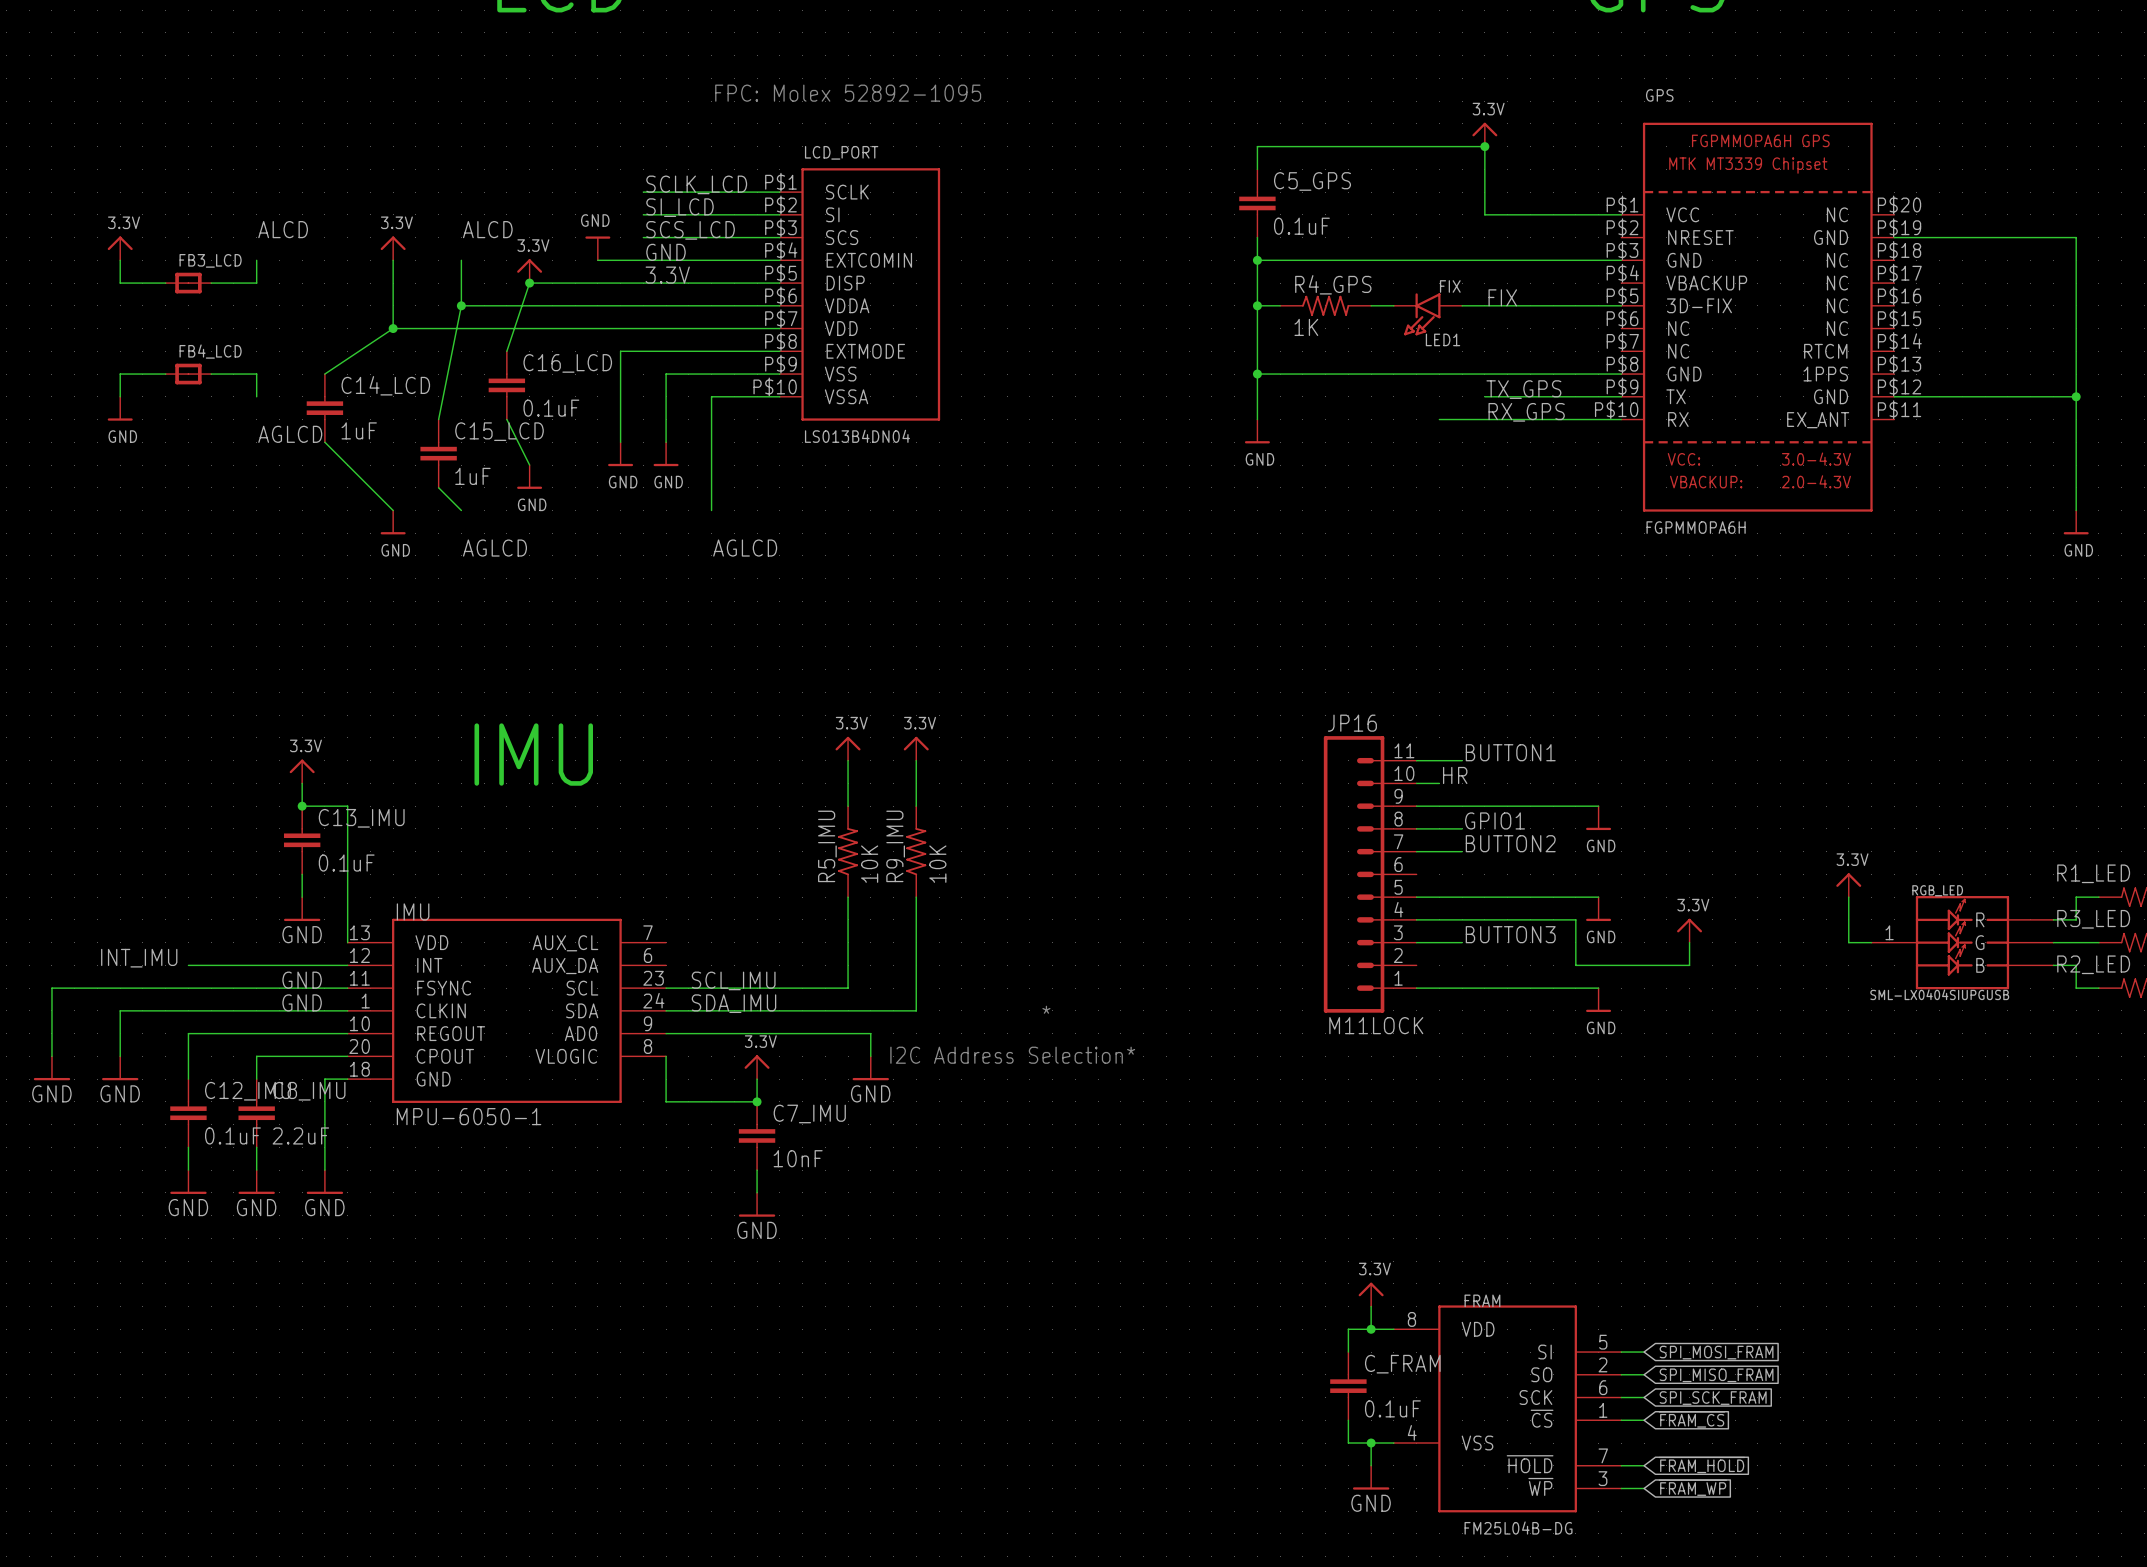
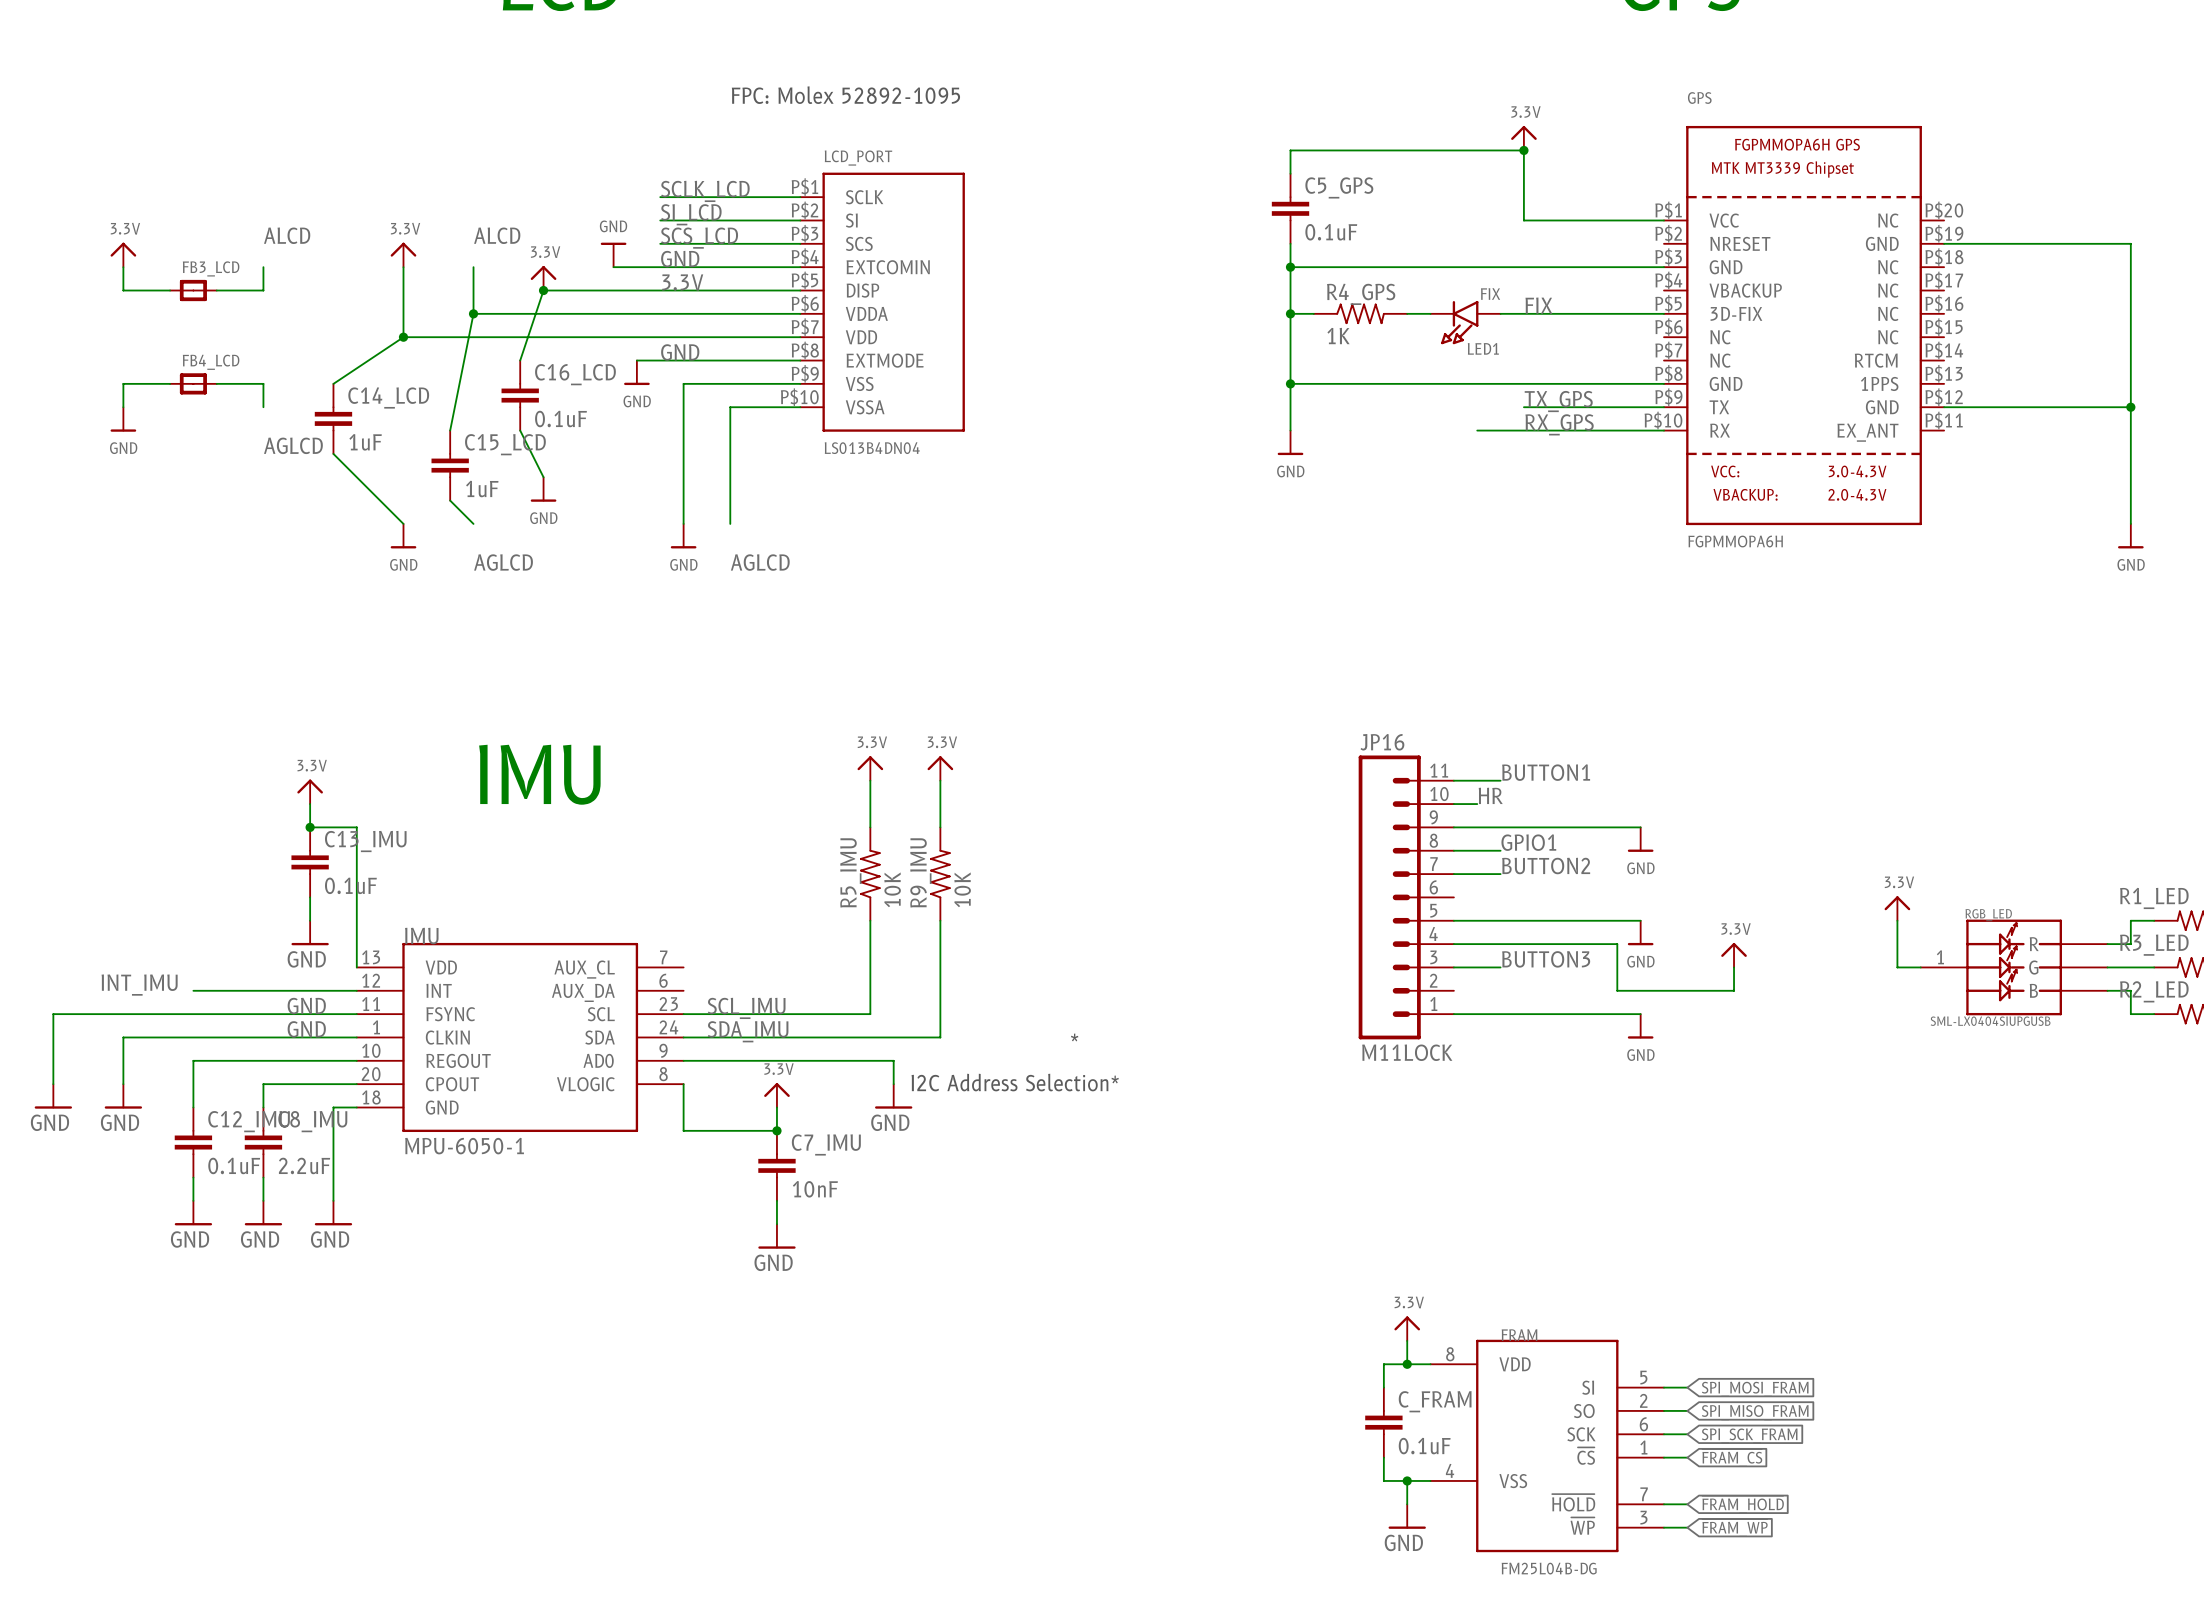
label: none -> GND (680, 352)
wire: (620, 351) (620, 442) -> none
power symbol: none -> GND (636, 372)
wire: none -> (683, 453) (683, 523)
power symbol: GND (620, 454) -> none
power symbol: GND (666, 454) -> none
power symbol: none -> GND (683, 536)

